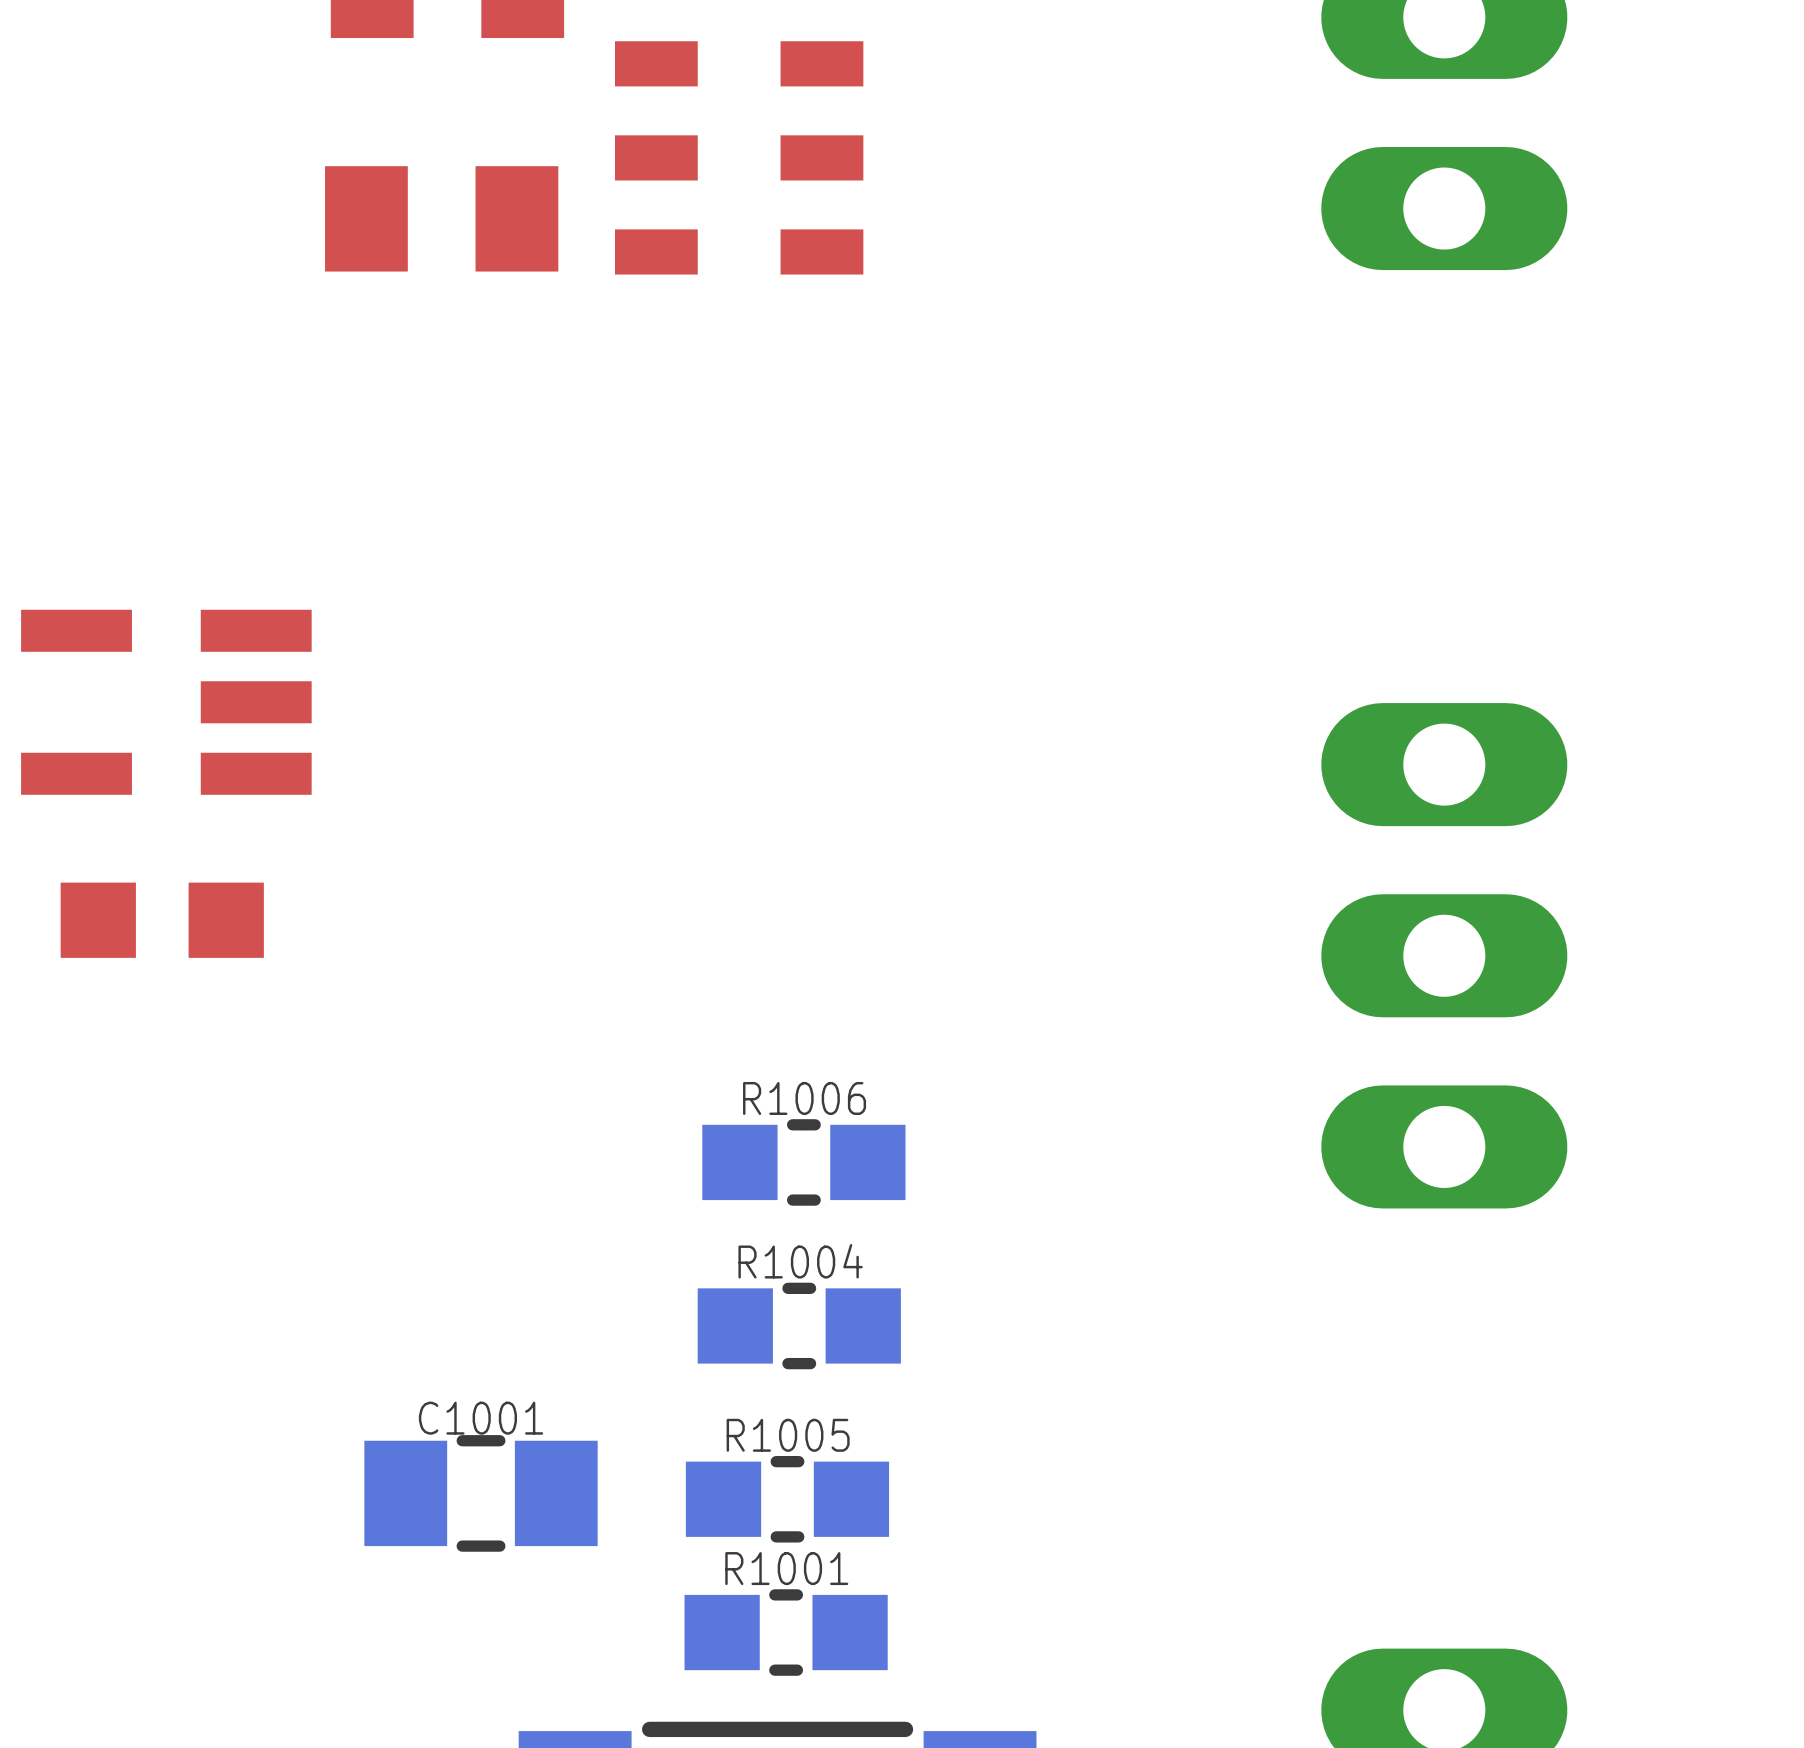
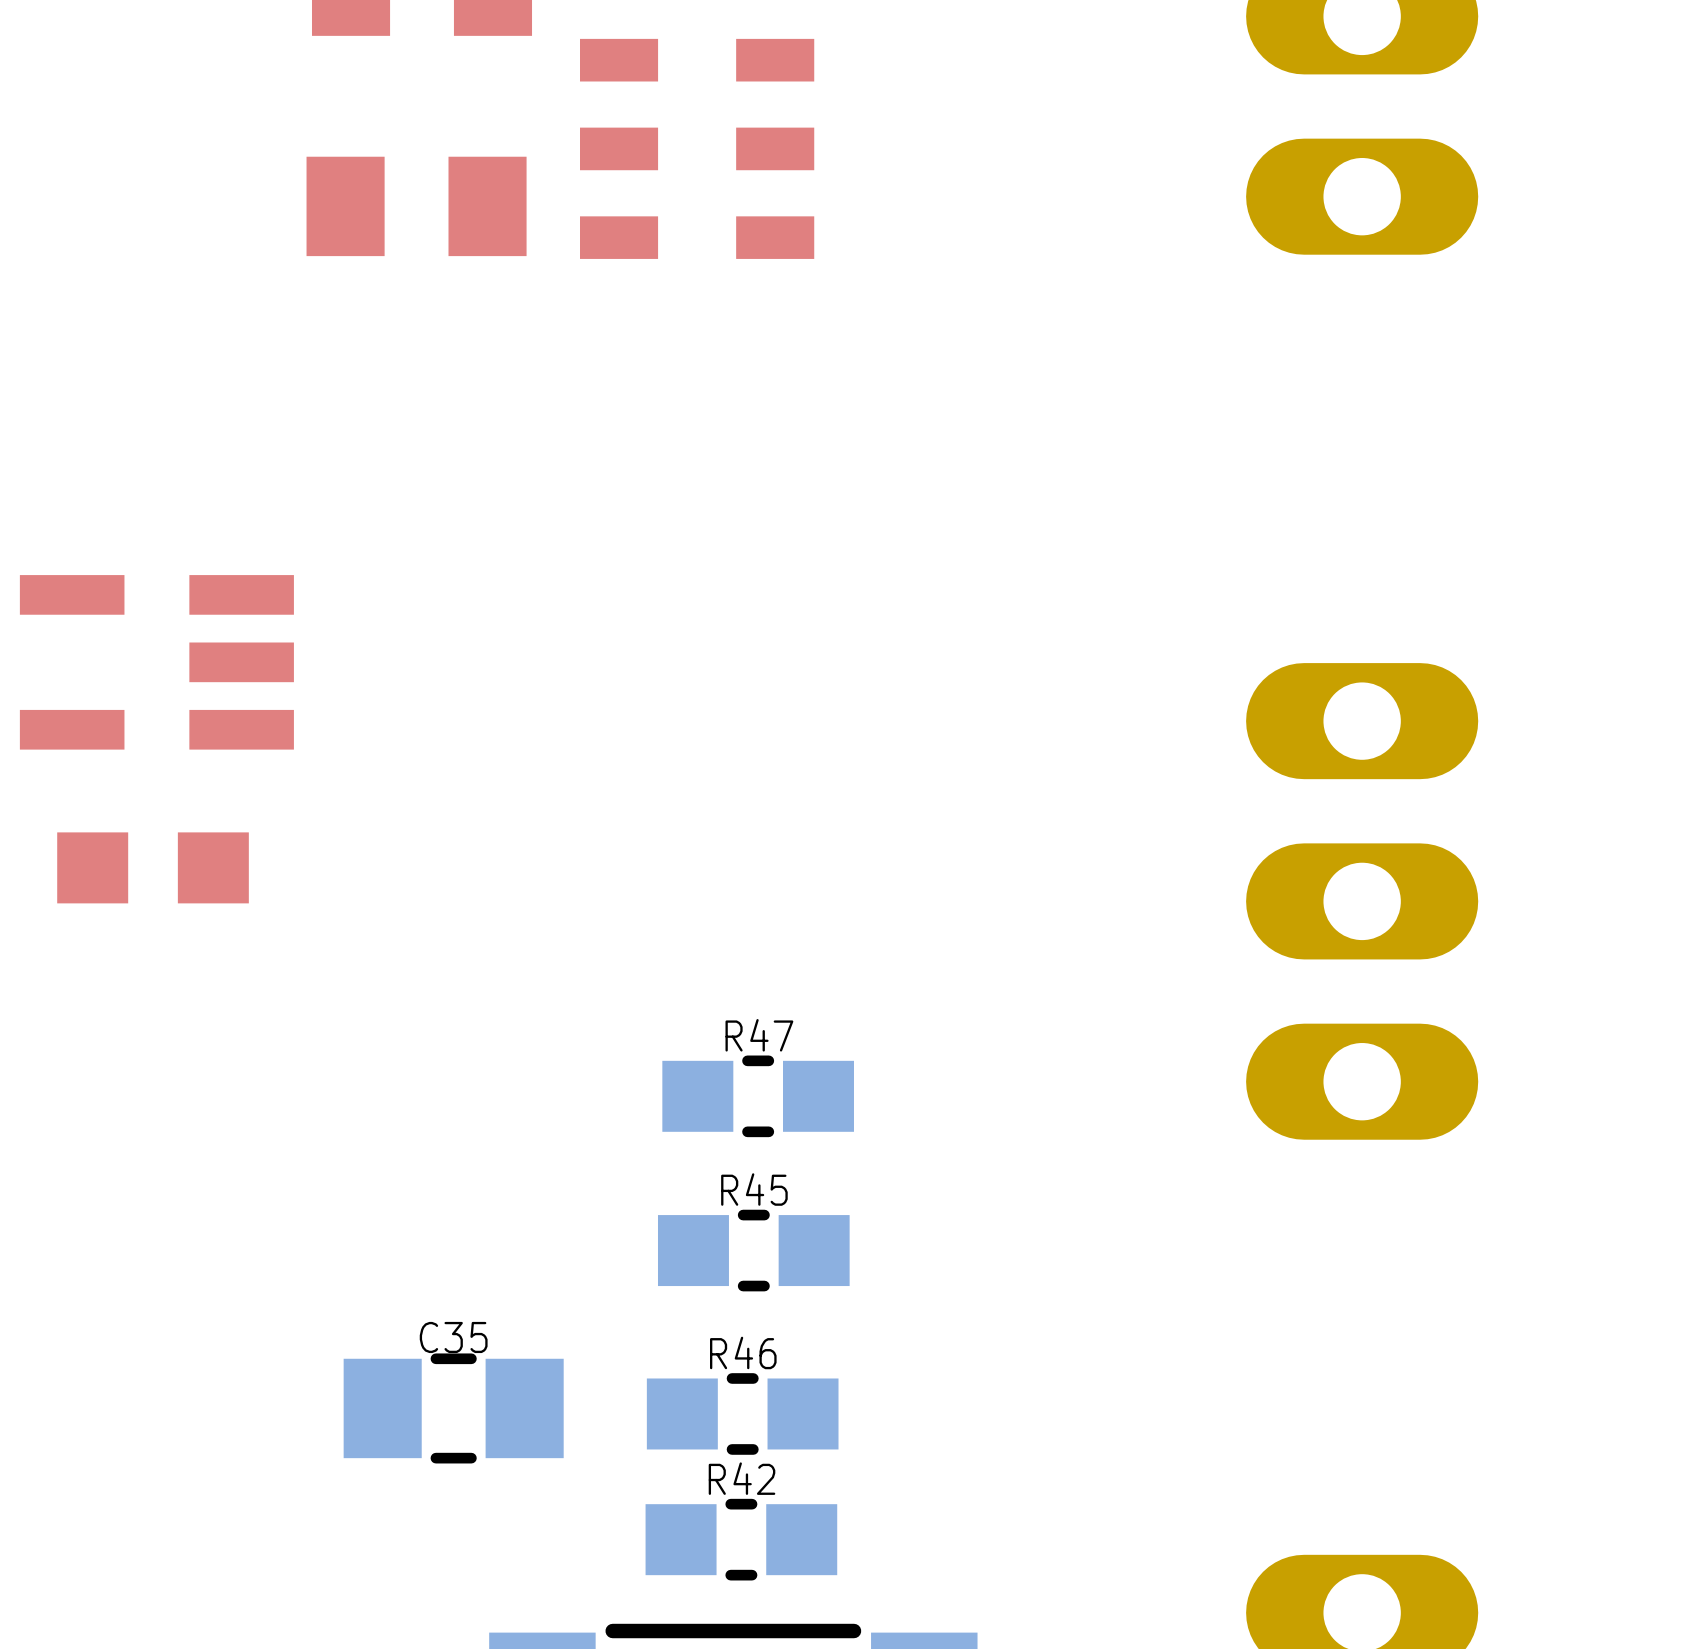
R1006 name: R1006 (804, 1098) -> R47 (759, 1035)
R1004 name: R1004 (800, 1261) -> R45 (754, 1189)
C1001 name: C1001 (481, 1418) -> C35 (453, 1337)
R1005 name: R1005 (788, 1435) -> R46 (743, 1352)
R1001 name: R1001 (786, 1568) -> R42 (742, 1478)

